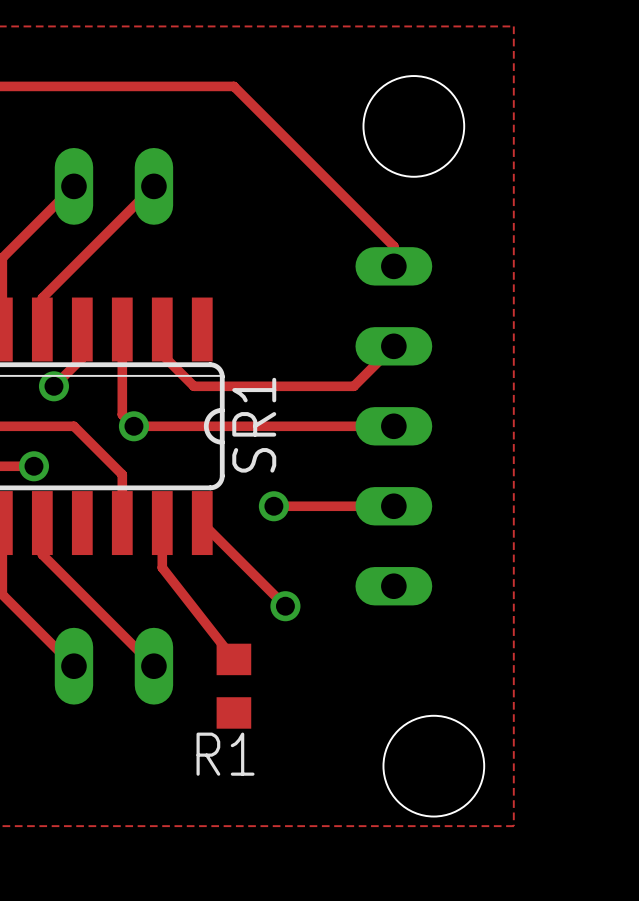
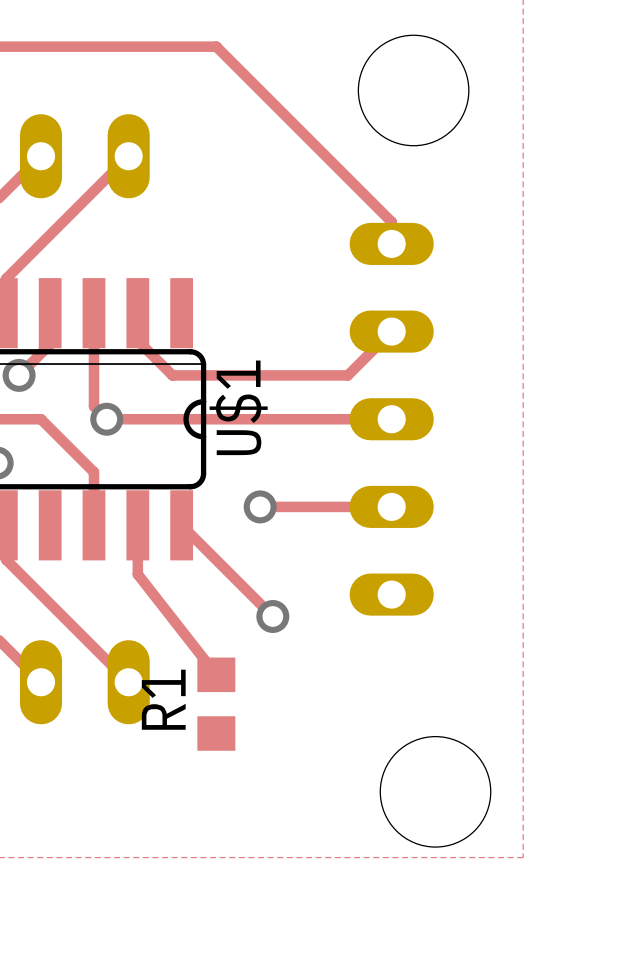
SR1 name: SR1 (254, 425) -> U$1 (238, 407)
R1 name rotation: 0° (225, 754) -> 90° counterclockwise (163, 699)
R1 name position: R1 (225, 754) -> R1 (163, 699)

